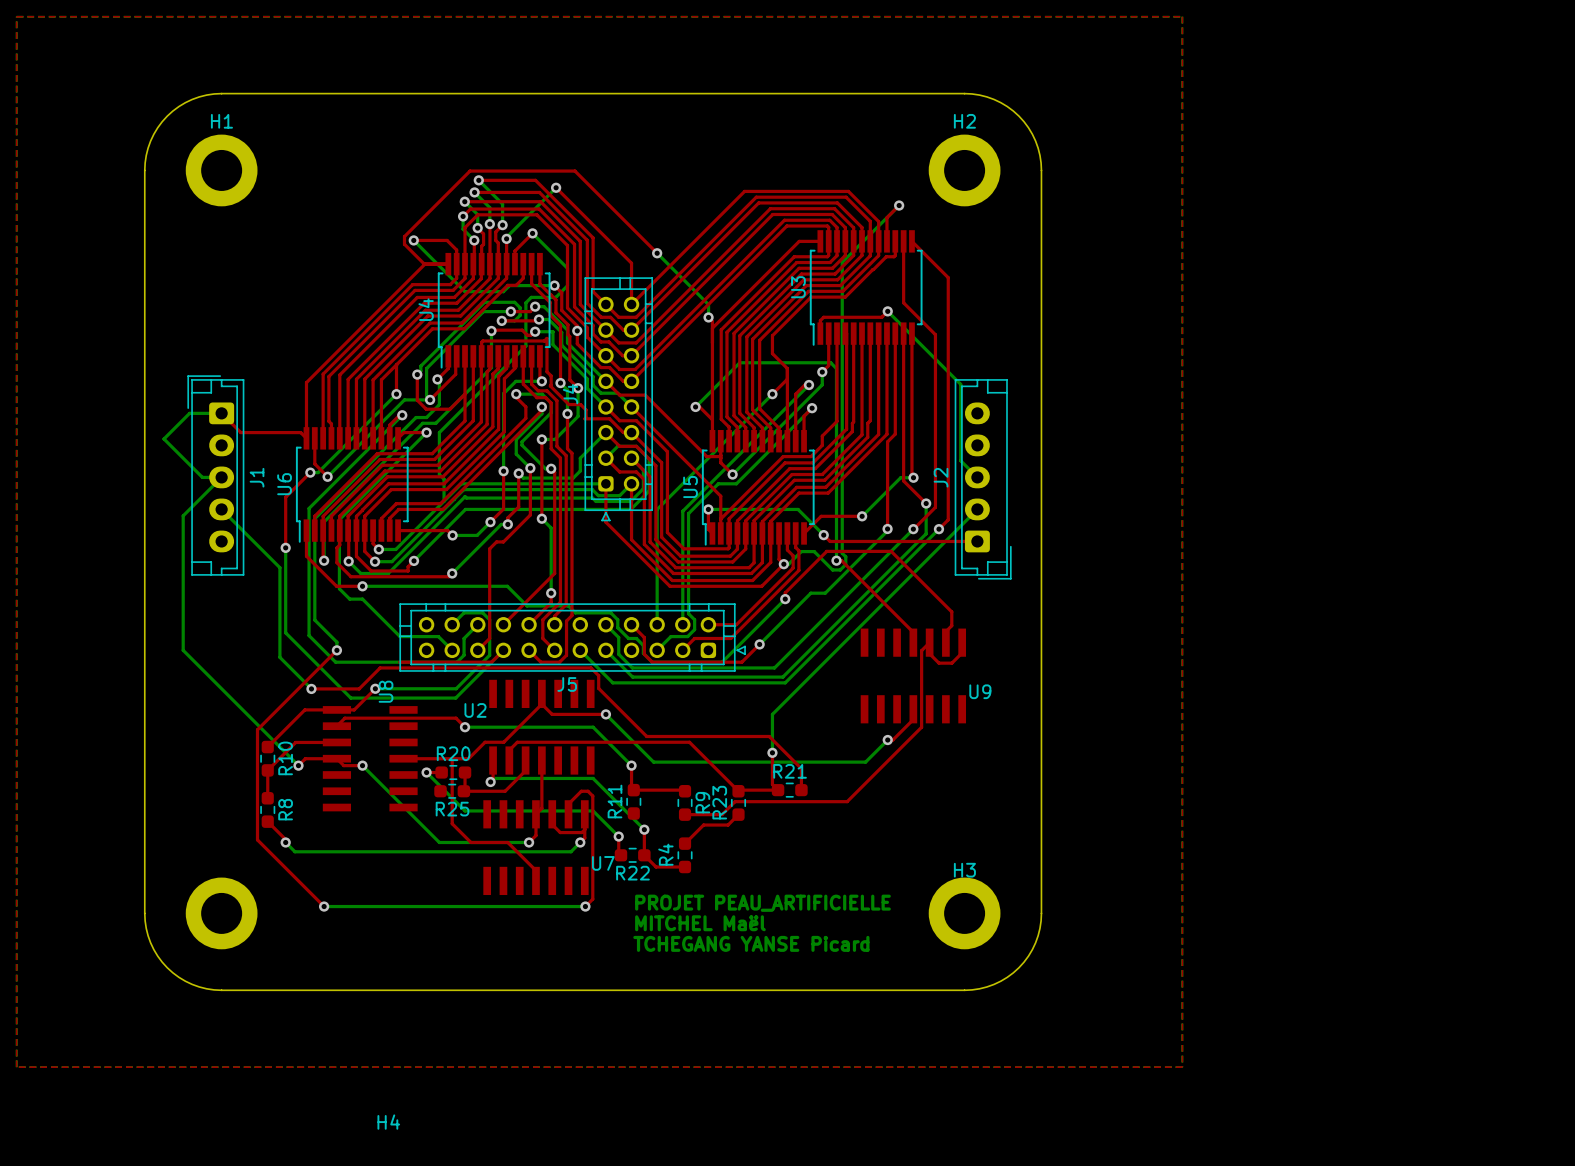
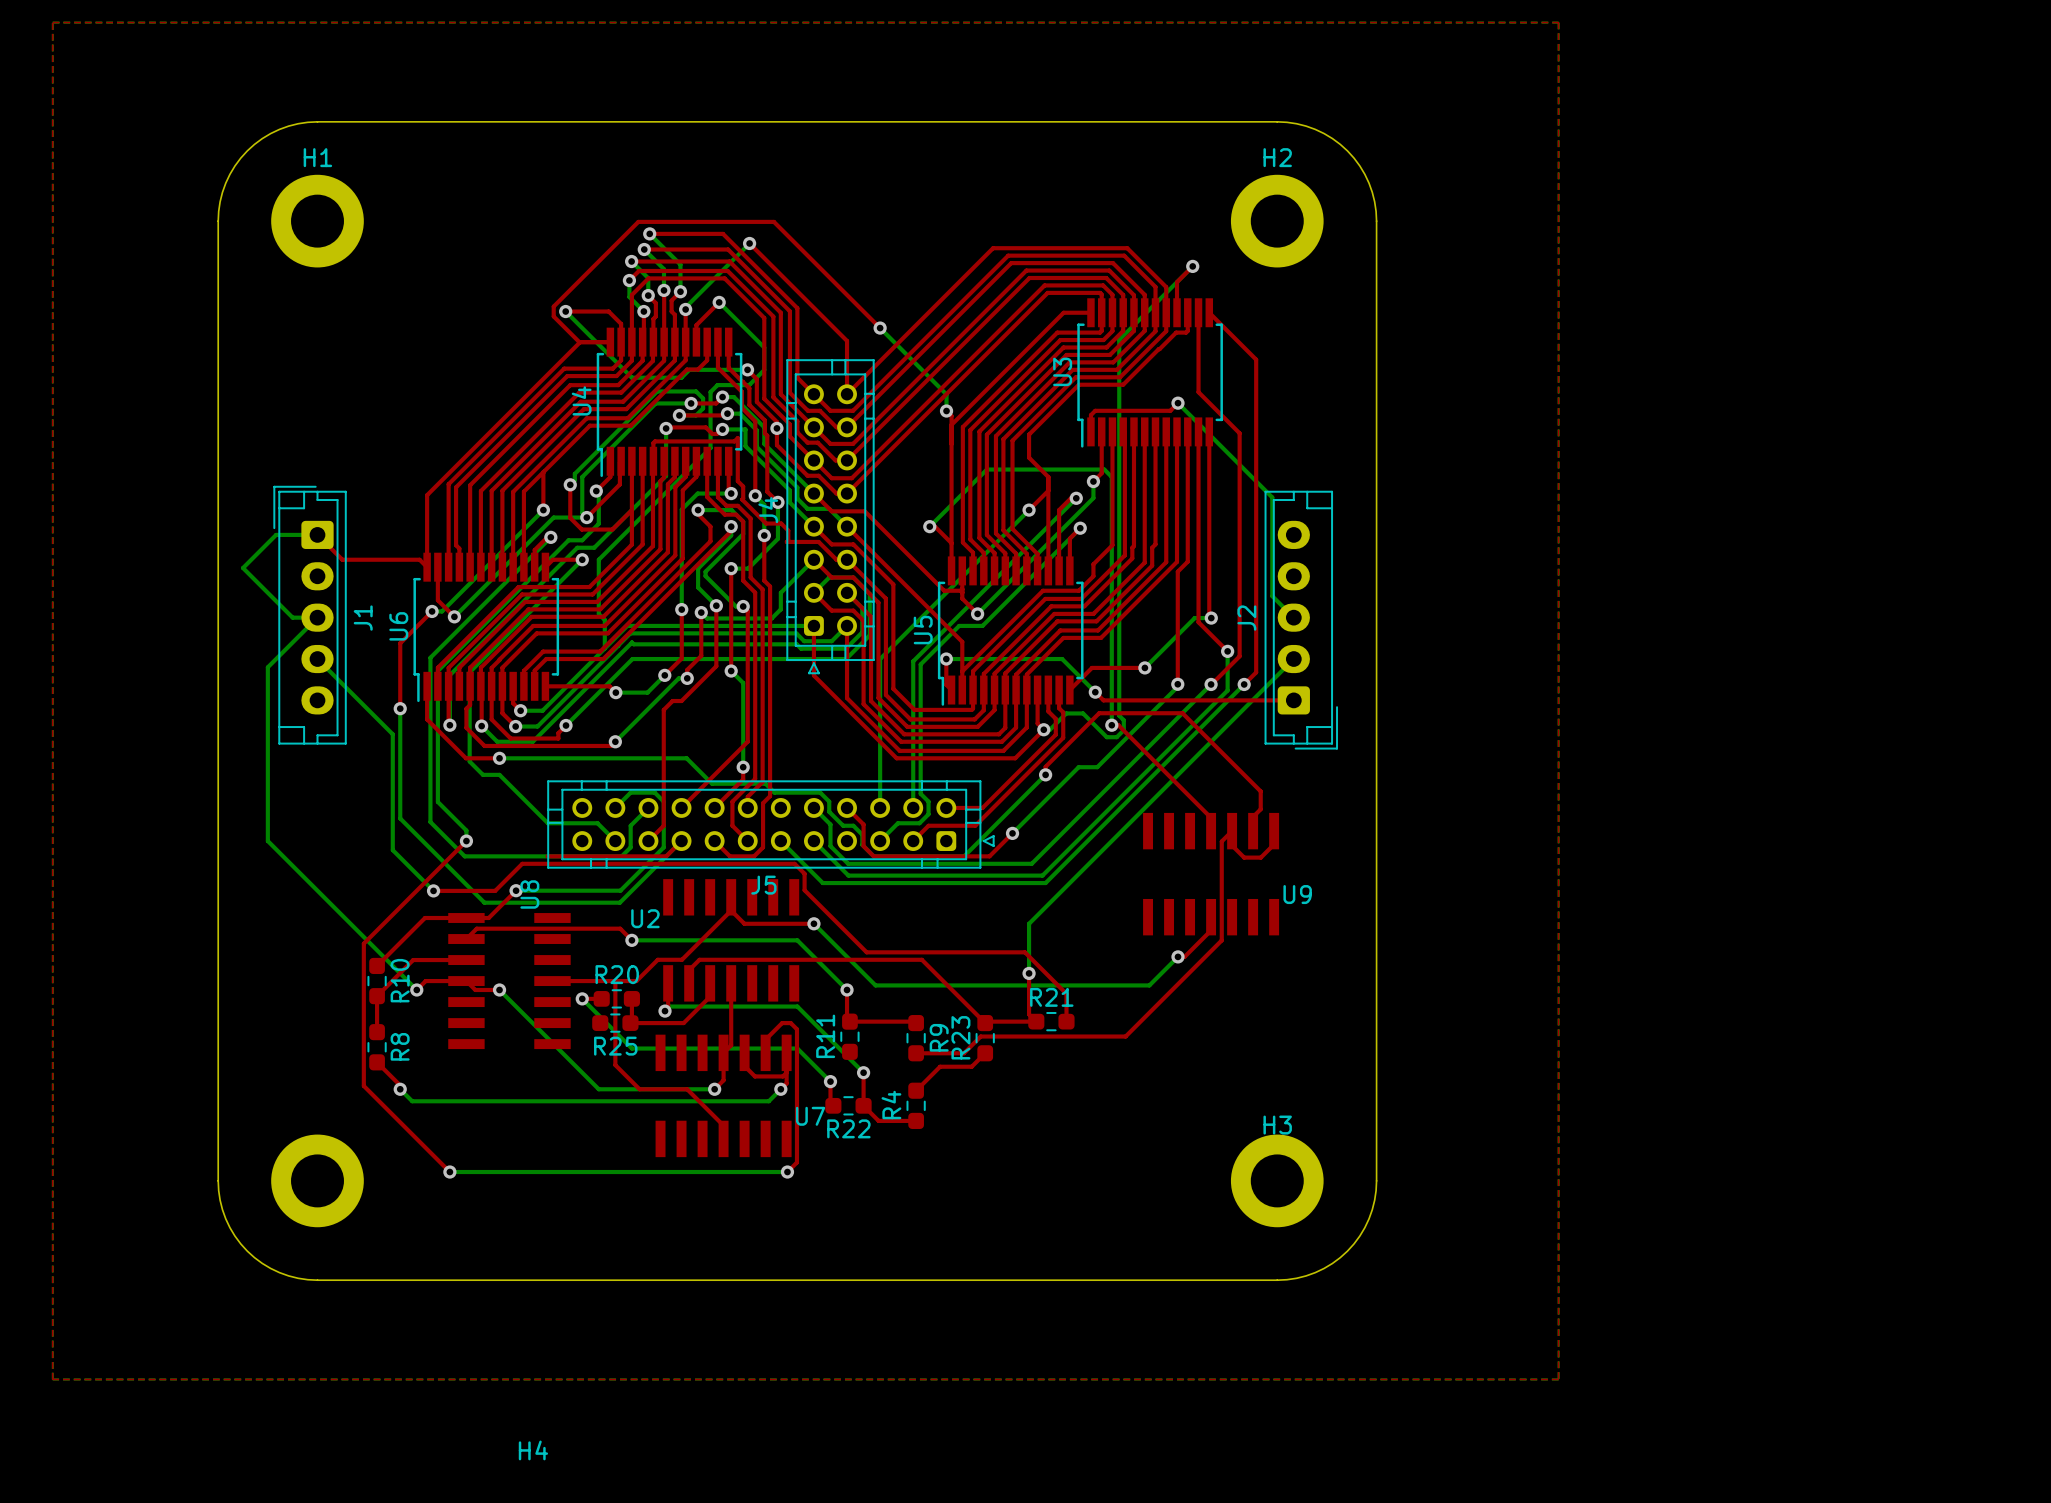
text: PROJET PEAU_ARTIFICIELLE (762, 903) -> none
text: MITCHEL Maël (700, 923) -> none
text: TCHEGANG YANSE Picard (751, 943) -> none

